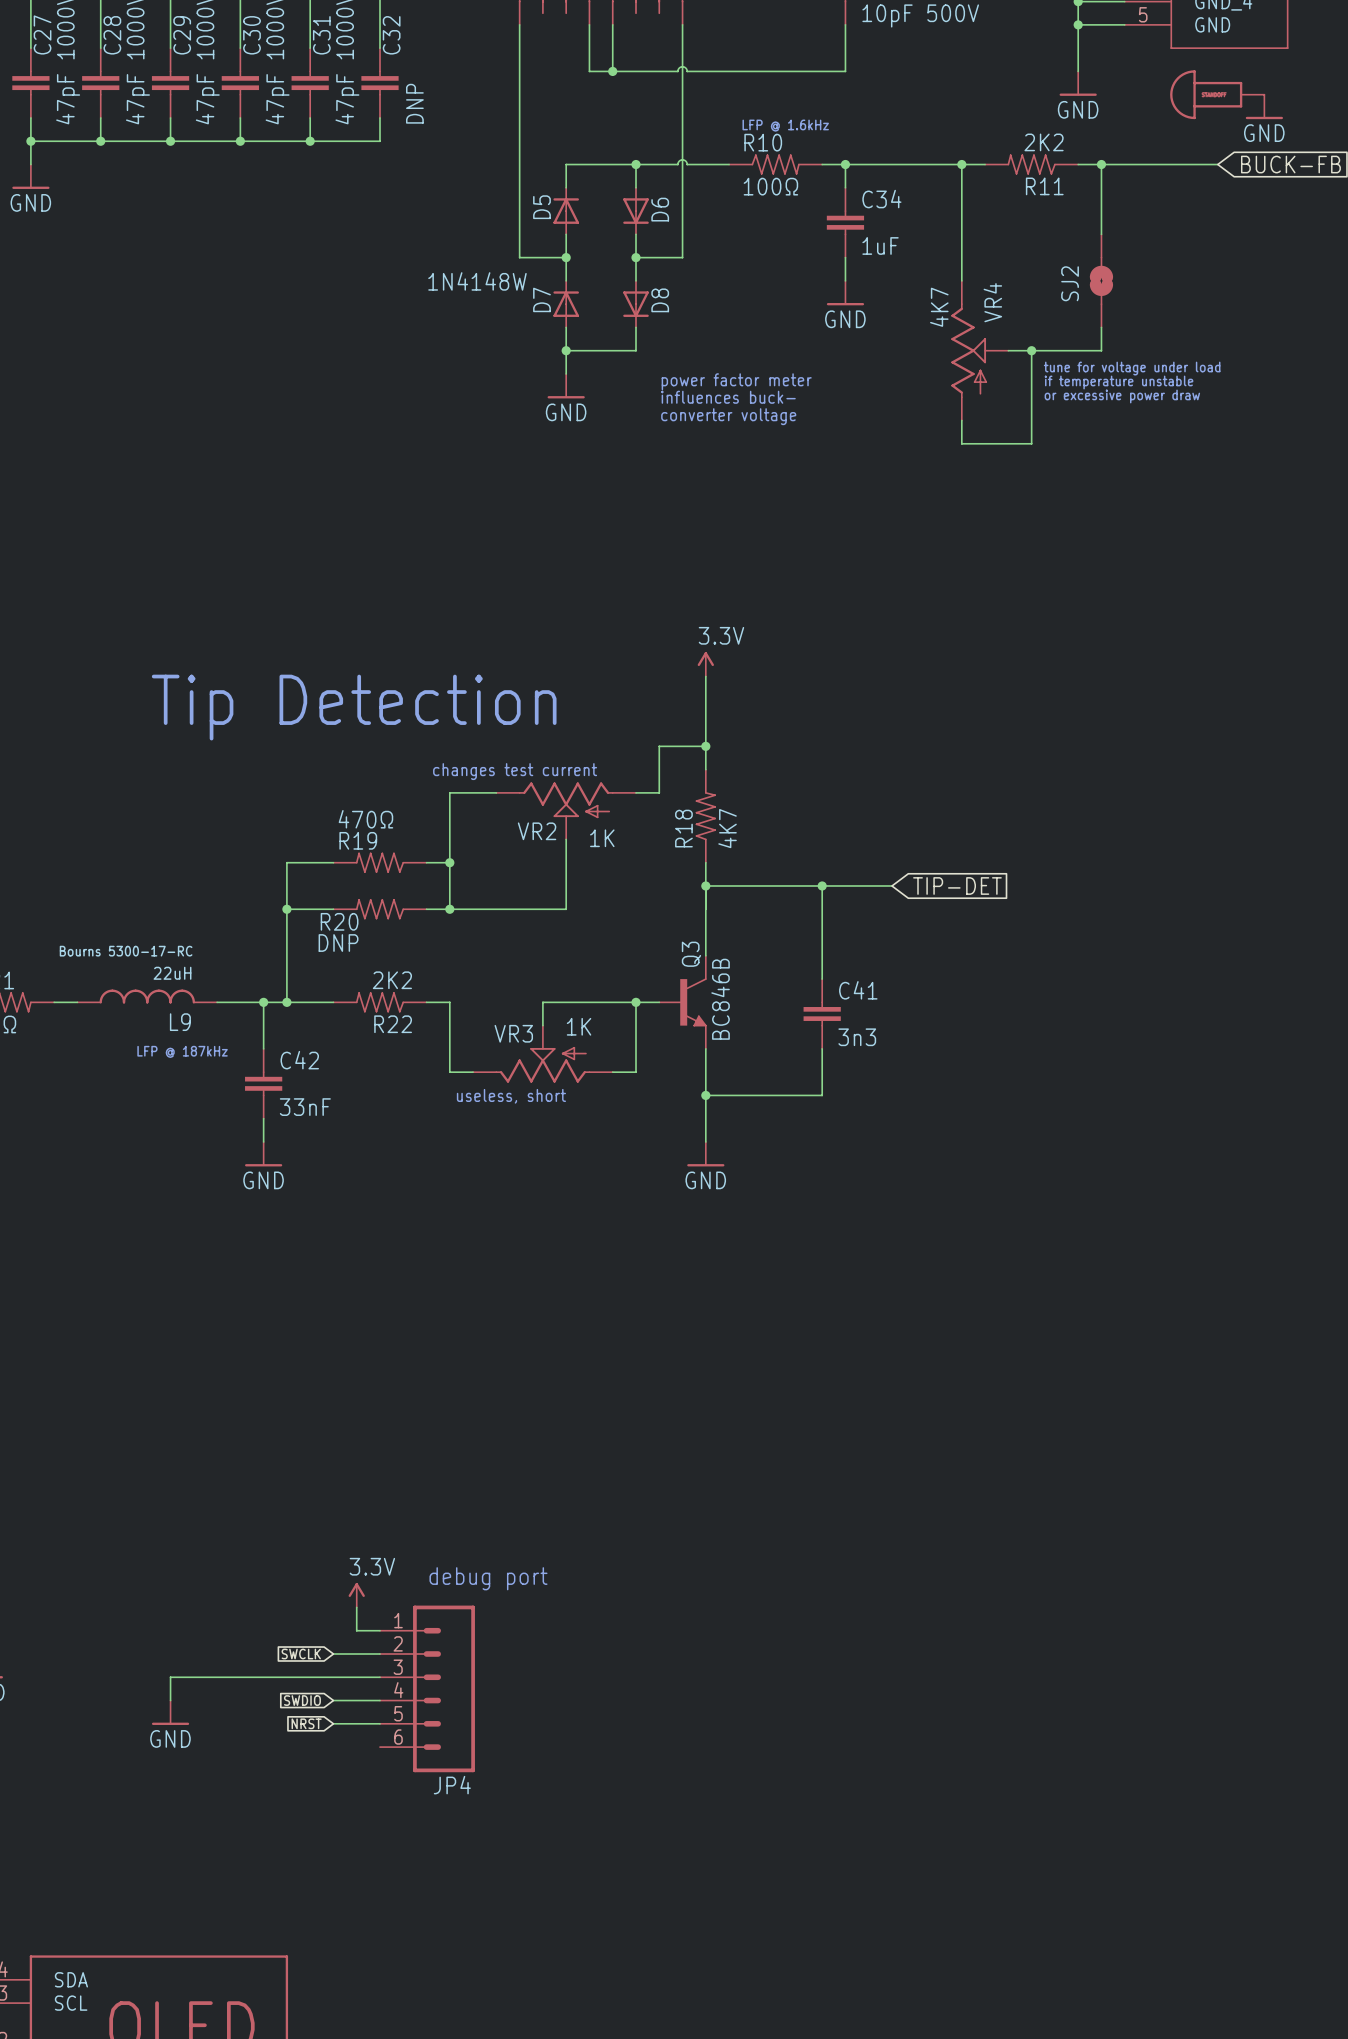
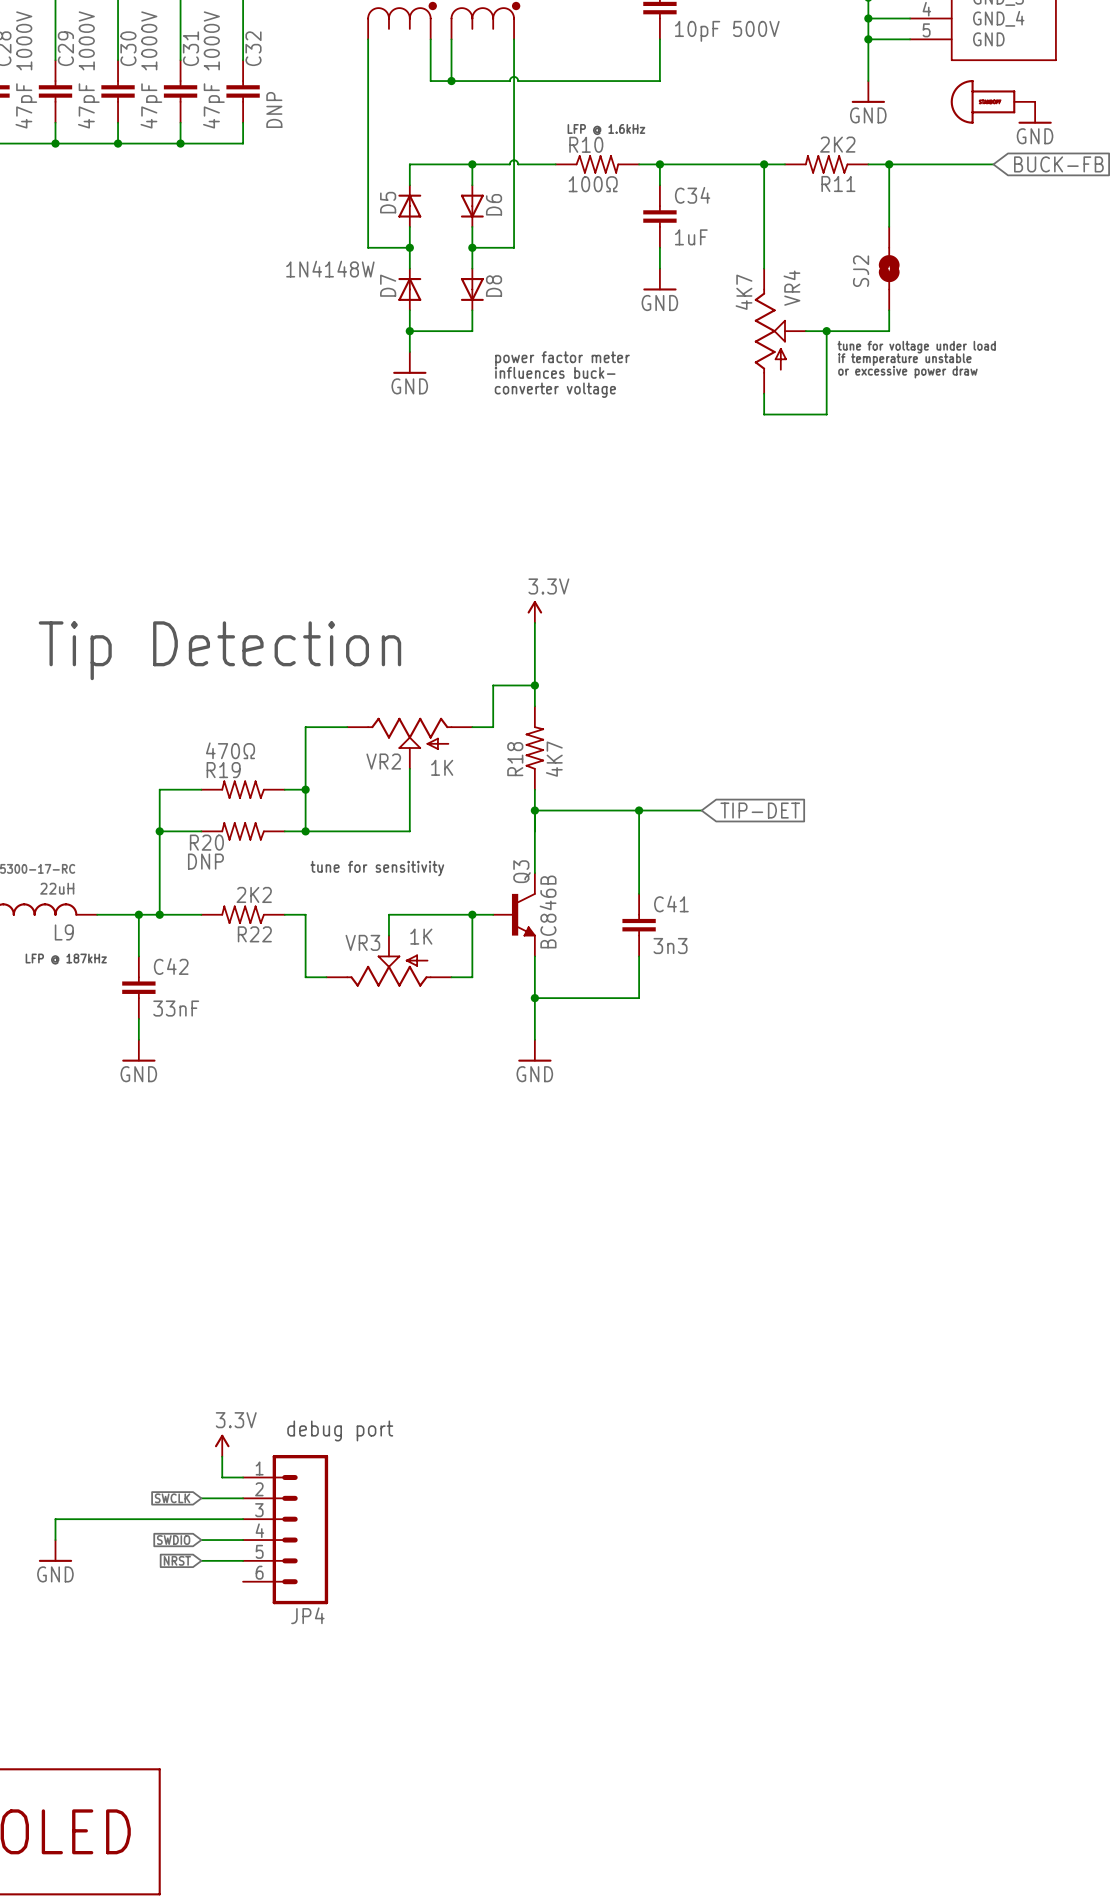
text: changes test current (515, 771) -> none
text: none -> tune for sensitivity (377, 868)
text: useless, short (511, 1096) -> none

